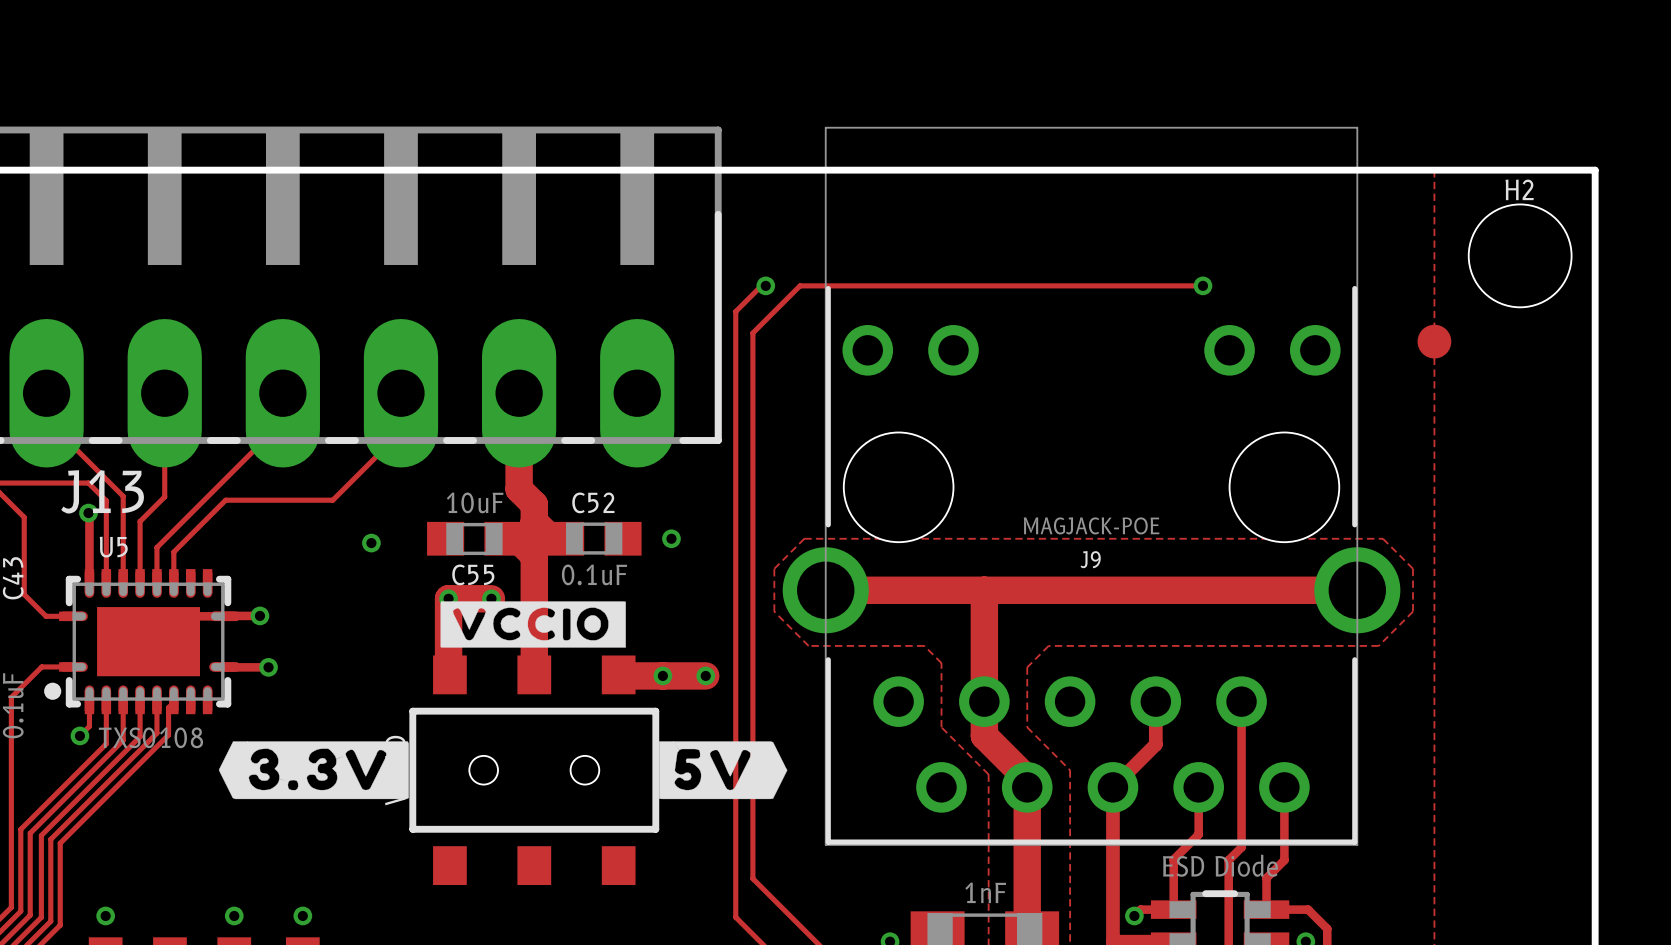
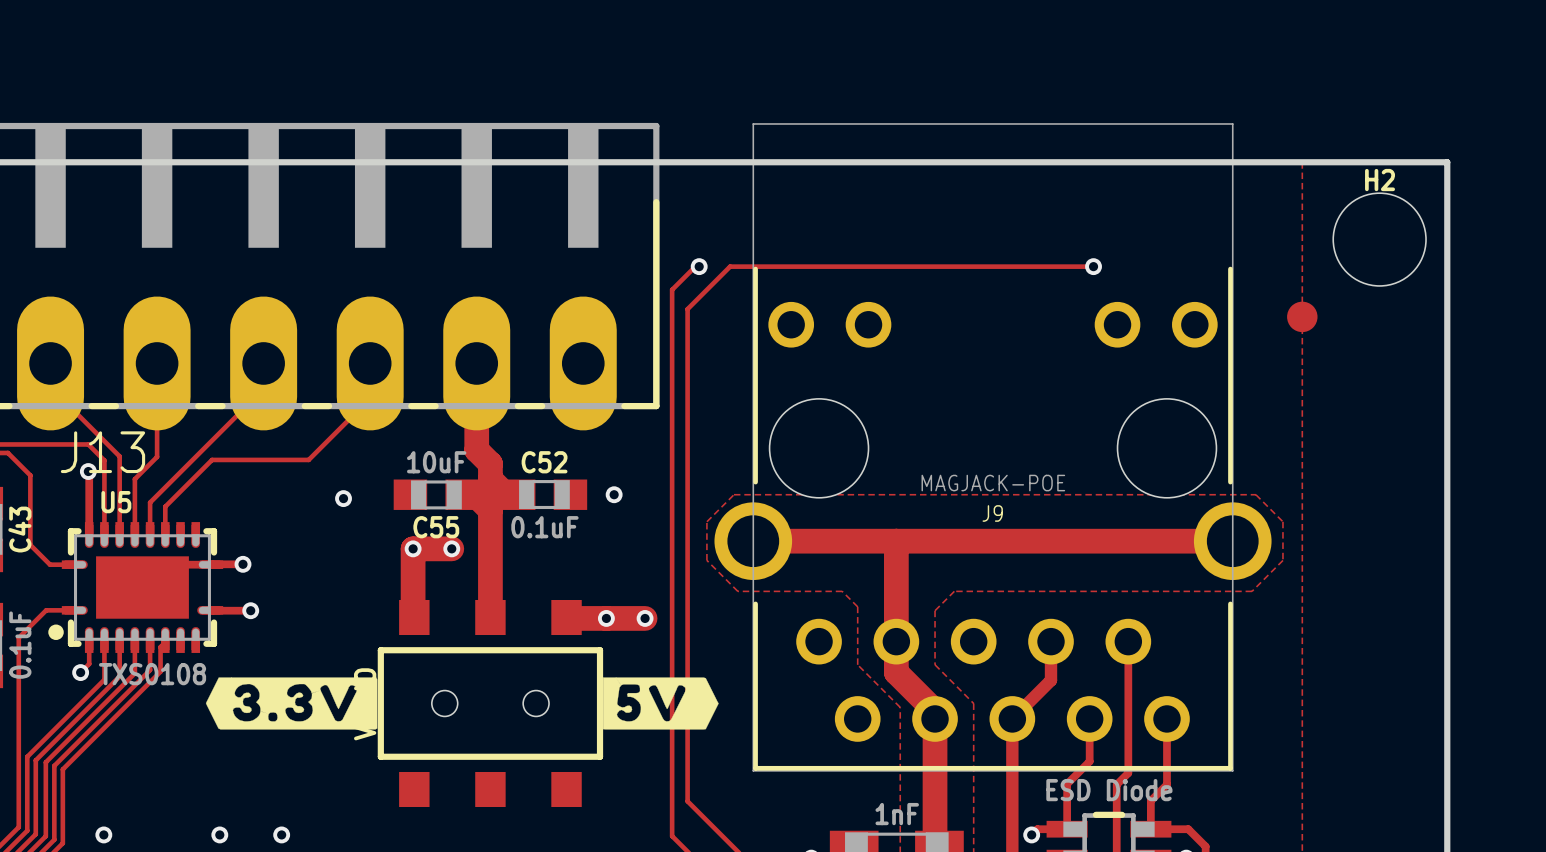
drawing: [440, 601, 626, 648] -> none

